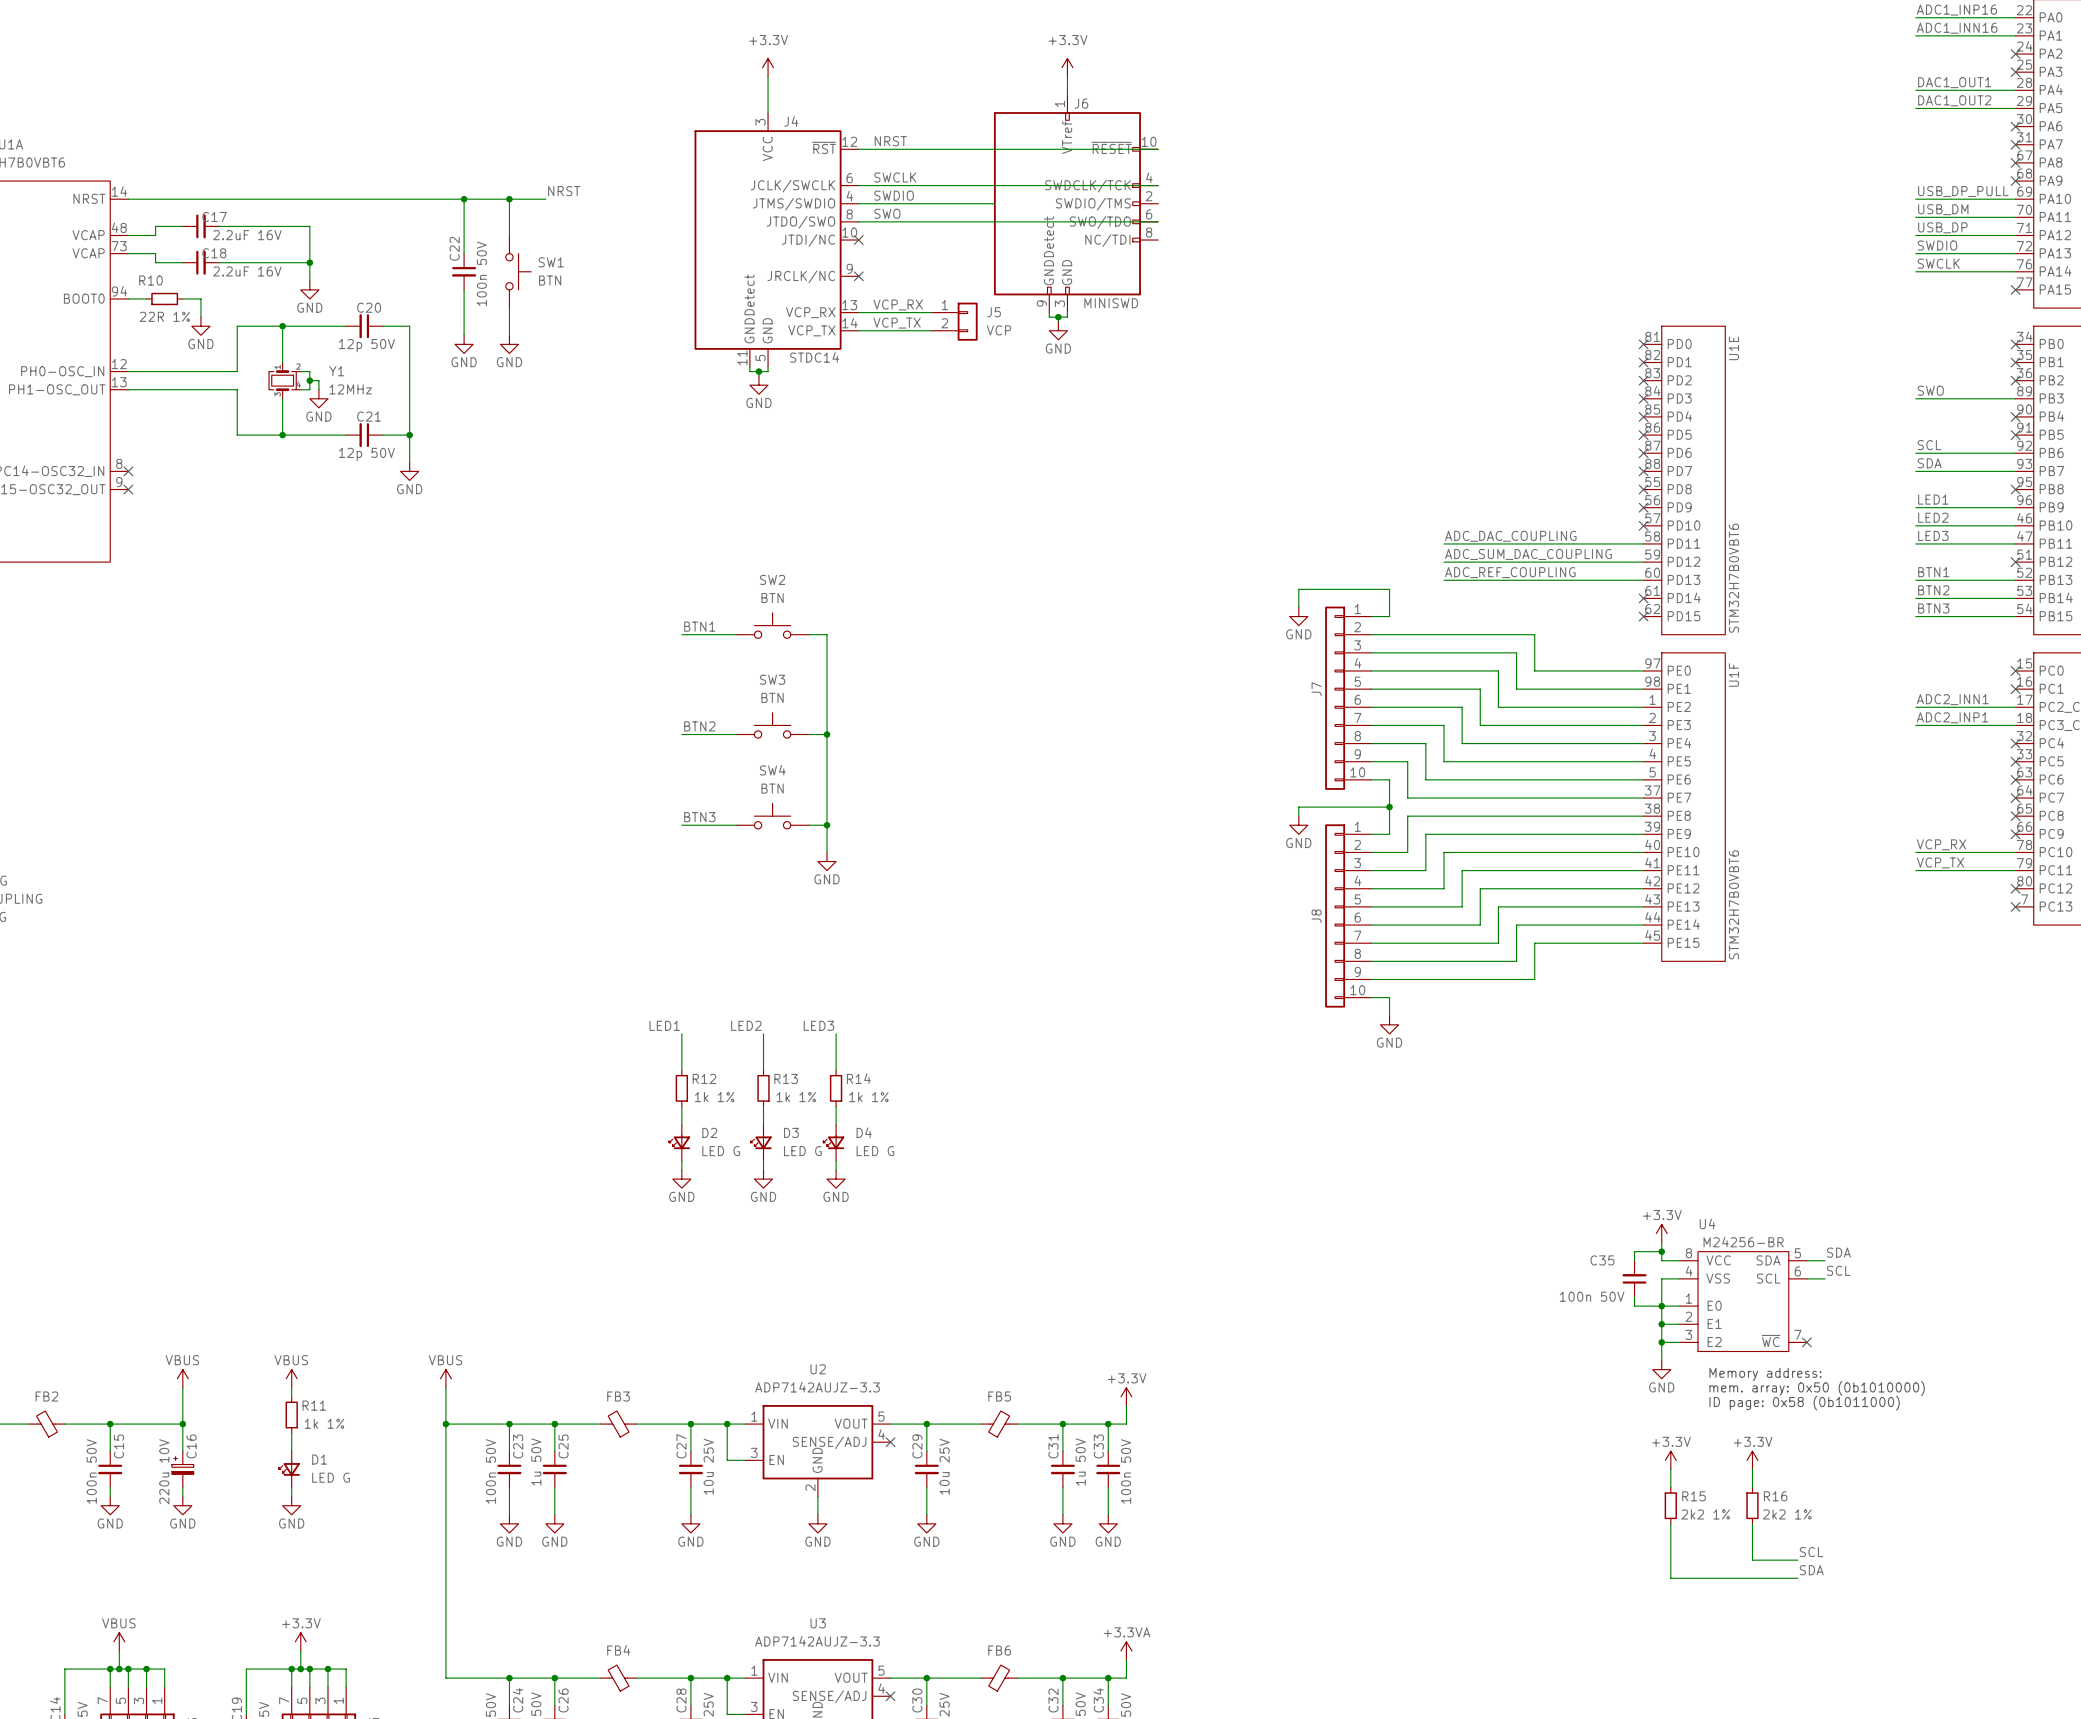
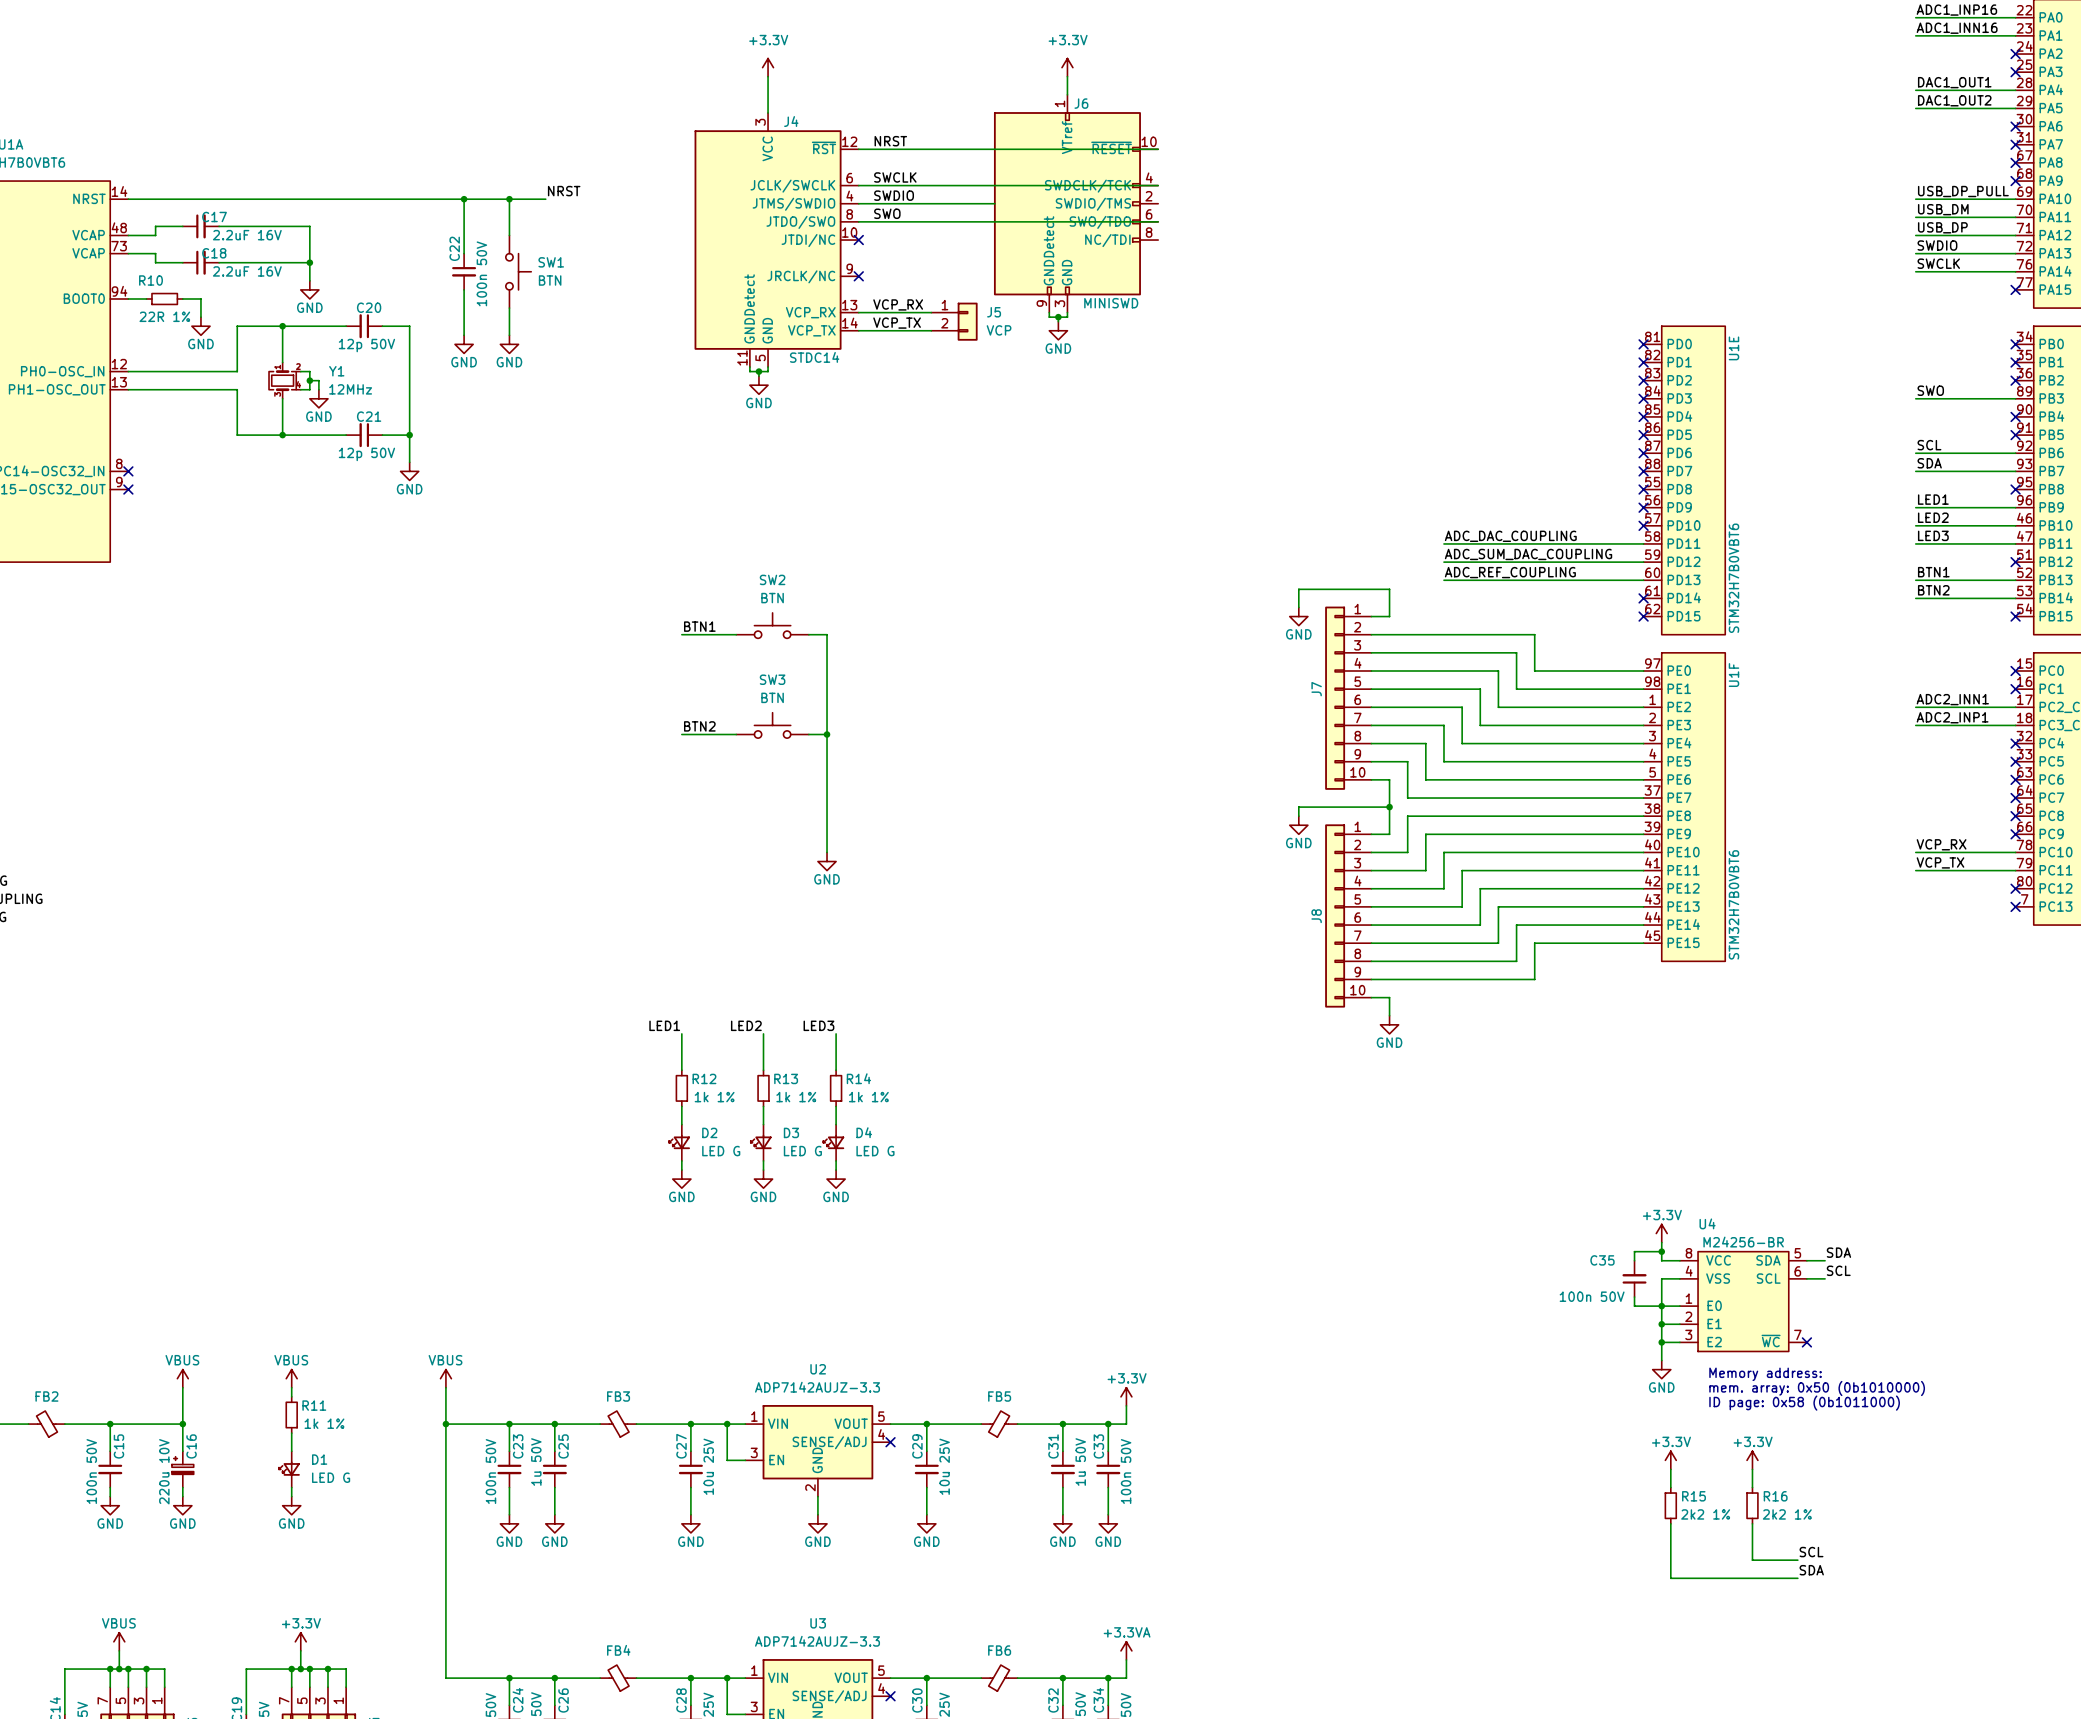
label: BTN3 (1933, 608) -> none
wire: (1915, 616) (2015, 616) -> none
no-connect mark: none -> (2015, 616)
SW4: BTN (772, 816) -> none
label: BTN3 (699, 817) -> none
wire: (681, 825) (736, 825) -> none
wire: (808, 825) (827, 825) -> none
junction: (827, 825) -> none

